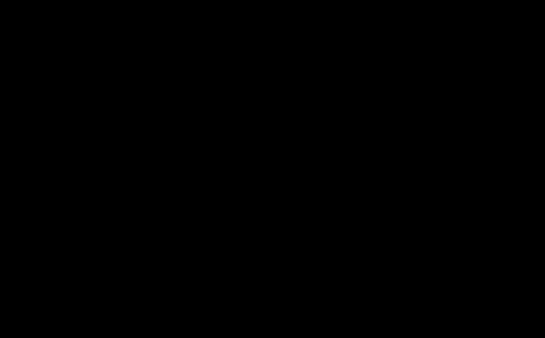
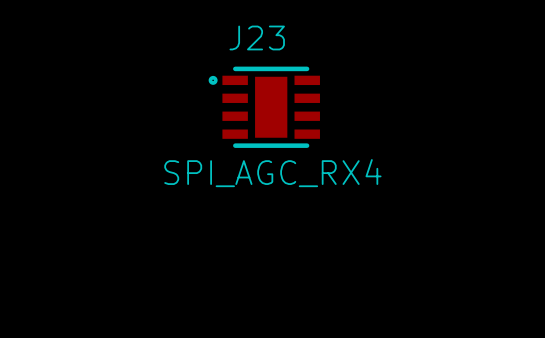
J23: none -> SPI_AGC_RX4 (264, 107)

